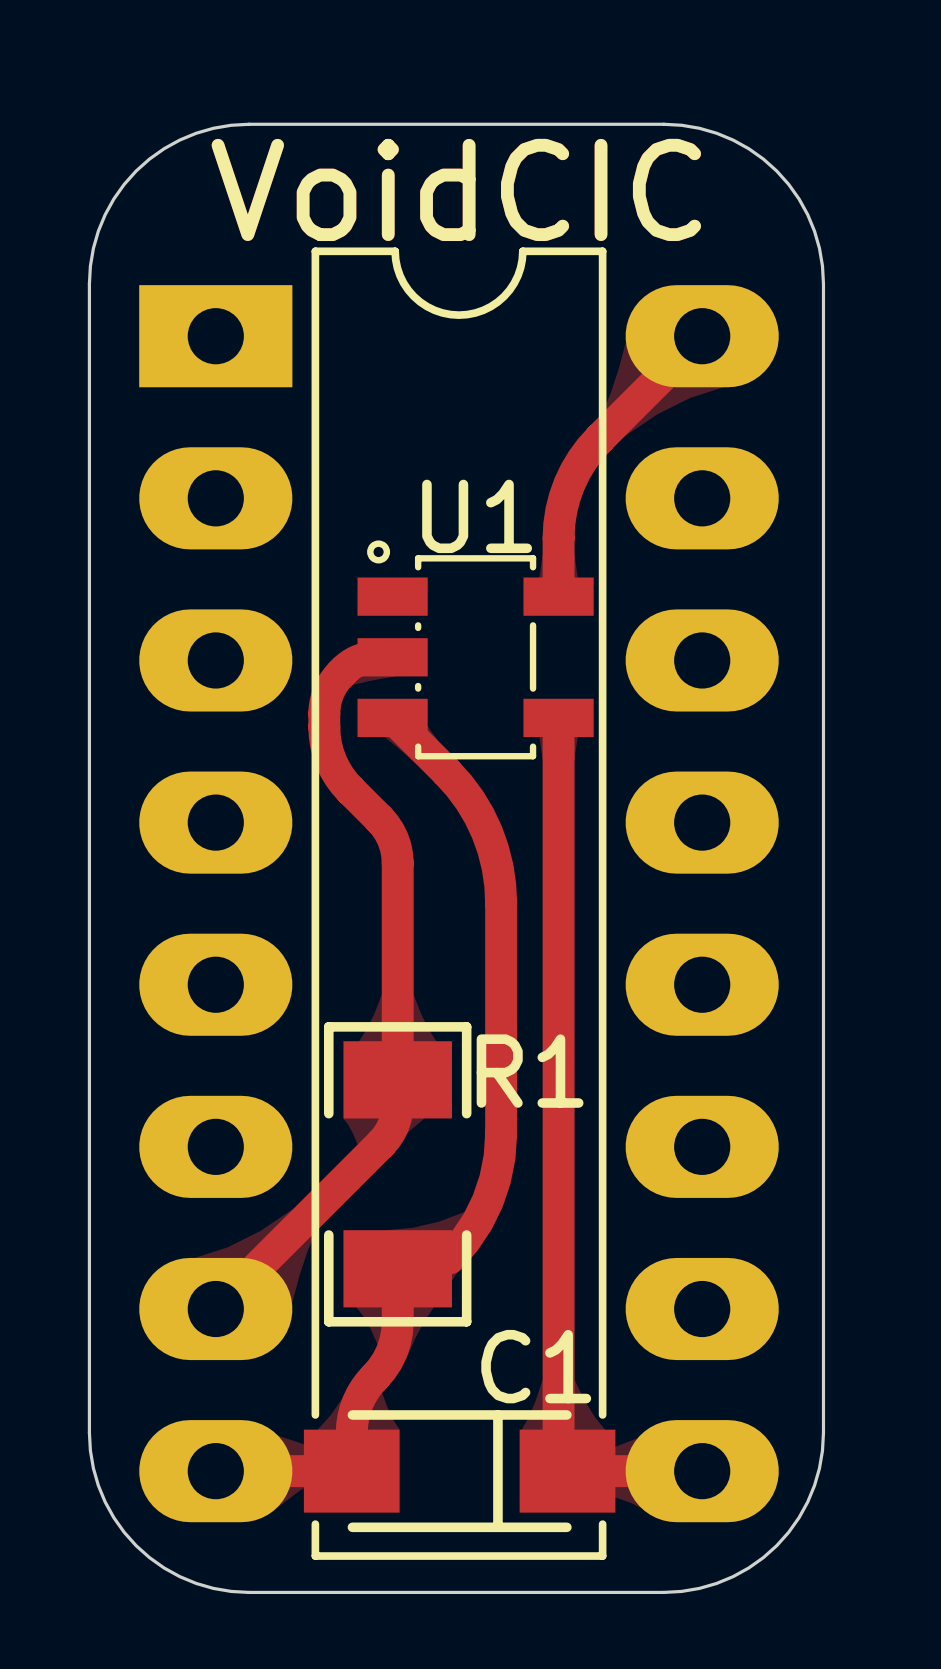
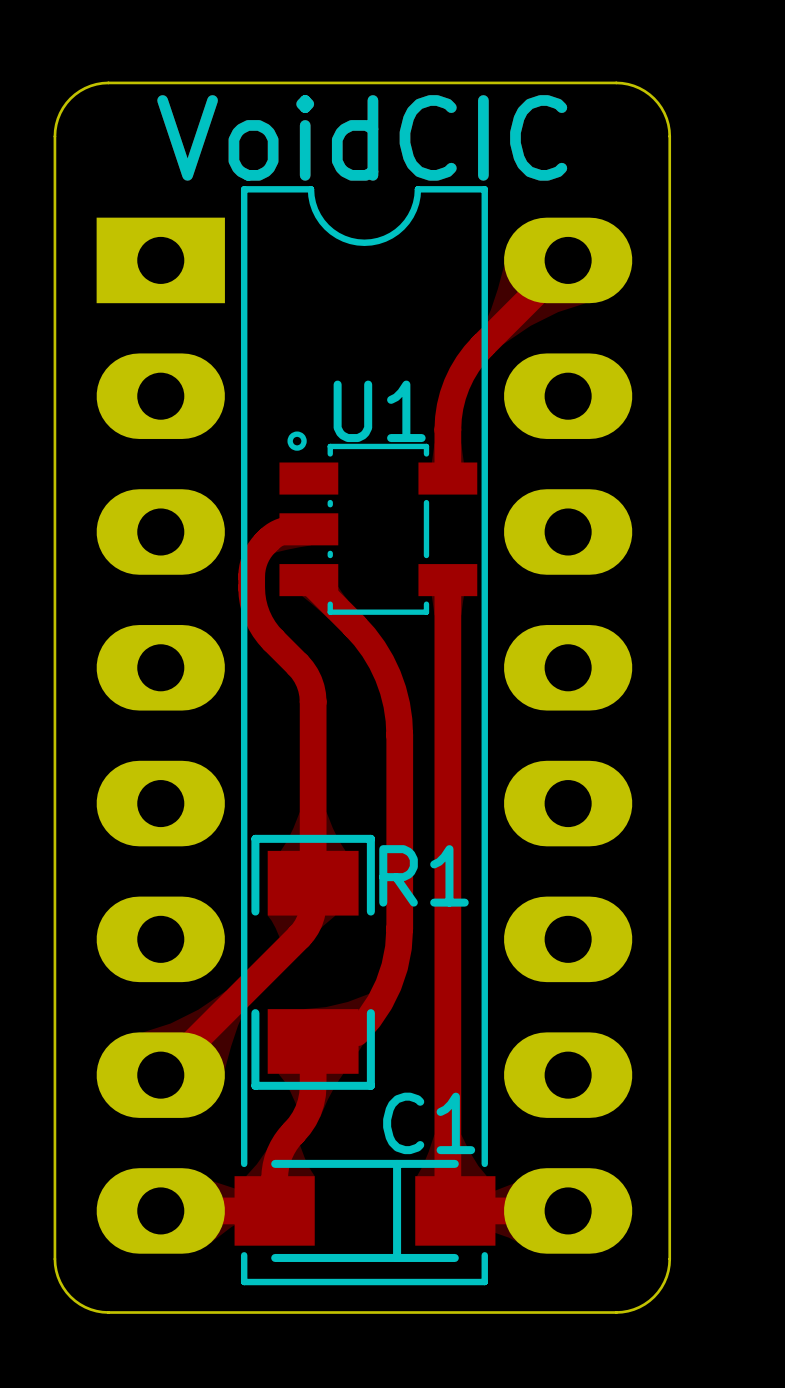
board edge: (248, 124) (231, 125) (196, 133) (164, 148) (136, 171) (113, 198) (105, 214) (93, 248) (89, 283) -> (188, 82) (102, 83) (85, 88) (70, 98) (60, 113) (55, 130) (54, 216)
board edge: (663, 124) (681, 125) (716, 133) (748, 148) (776, 171) (799, 198) (814, 231) (822, 265) (823, 283) -> (536, 82) (622, 83) (639, 88) (654, 98) (664, 113) (669, 130) (669, 216)
board edge: (89, 1432) (93, 1468) (105, 1502) (113, 1517) (136, 1545) (164, 1567) (196, 1583) (213, 1588) (248, 1592) -> (54, 1178) (55, 1265) (60, 1282) (70, 1296) (85, 1307) (102, 1312) (188, 1312)
board edge: (823, 1432) (819, 1468) (807, 1502) (788, 1532) (776, 1545) (763, 1557) (733, 1576) (699, 1588) (663, 1592) -> (669, 1178) (669, 1265) (664, 1282) (654, 1296) (639, 1307) (622, 1312) (536, 1312)

